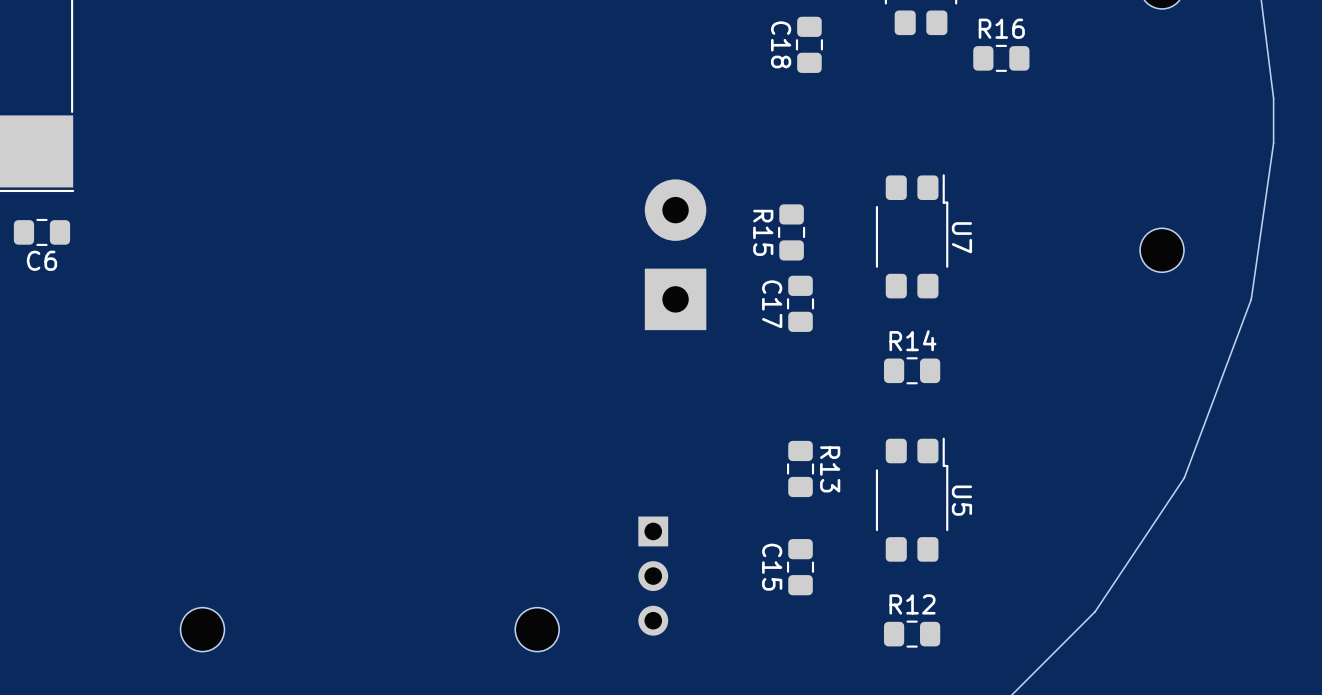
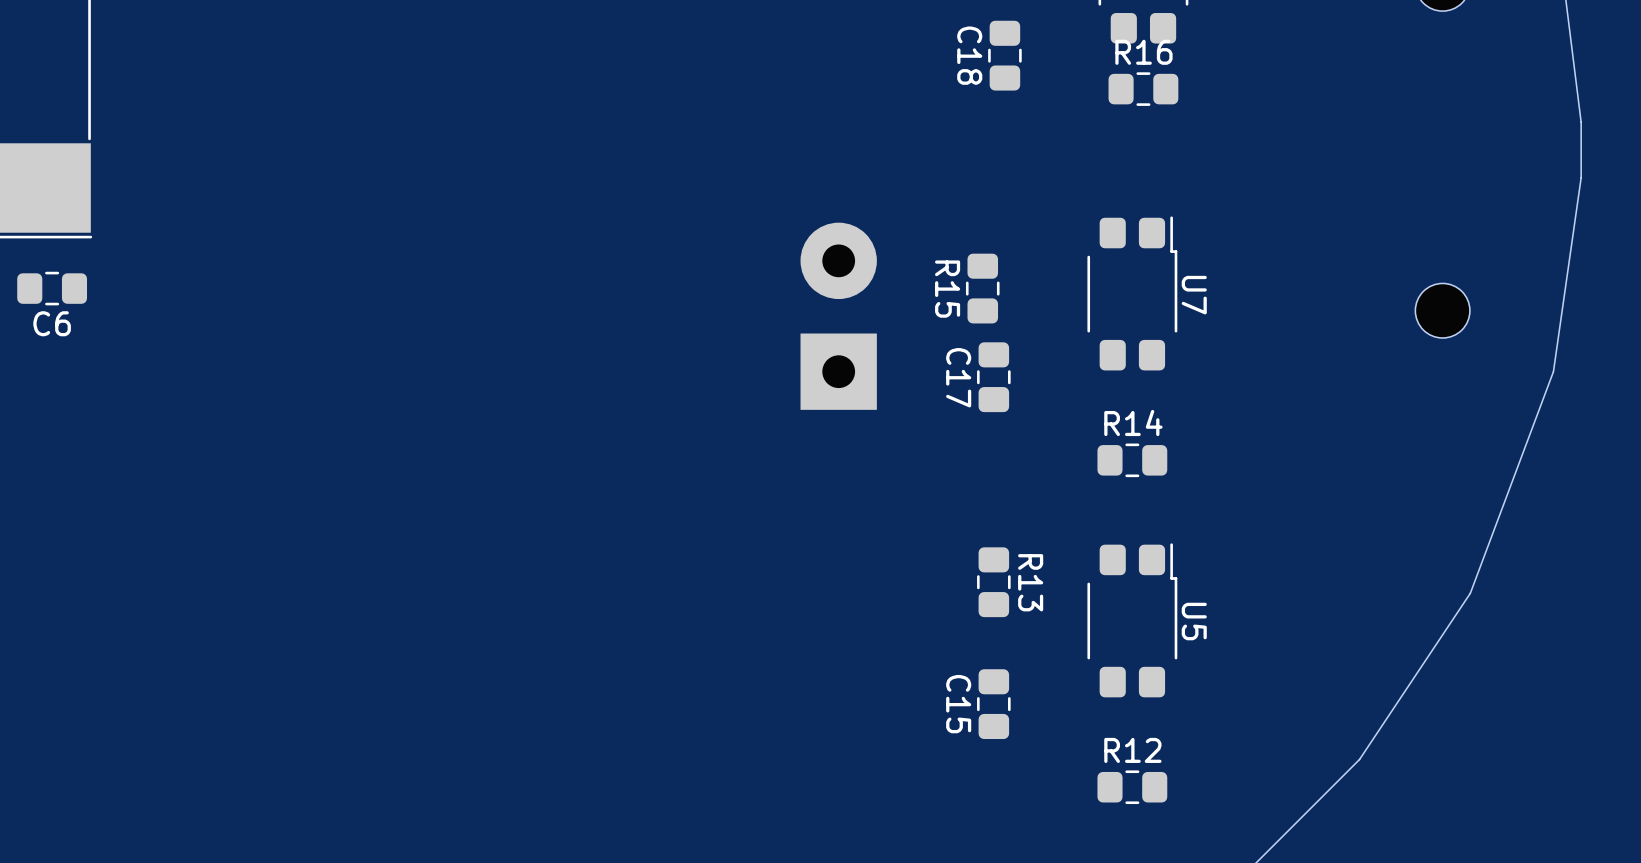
R16 position: (1001, 58) -> (1143, 89)
part: (653, 576) -> none
part: (202, 629) -> none
part: (537, 629) -> none

